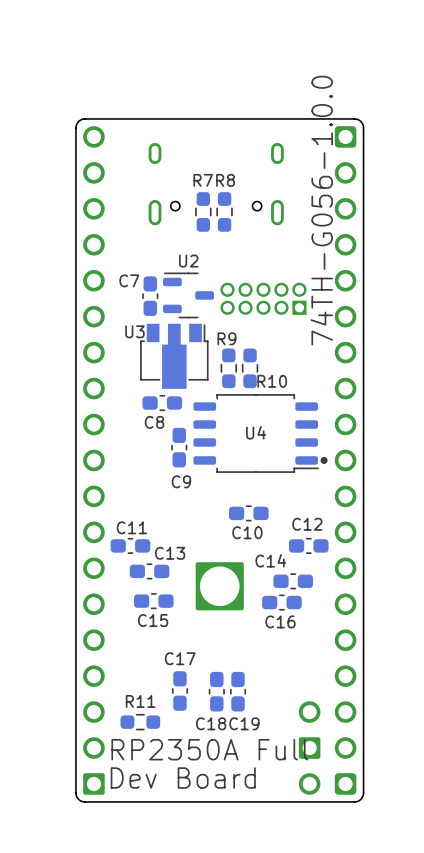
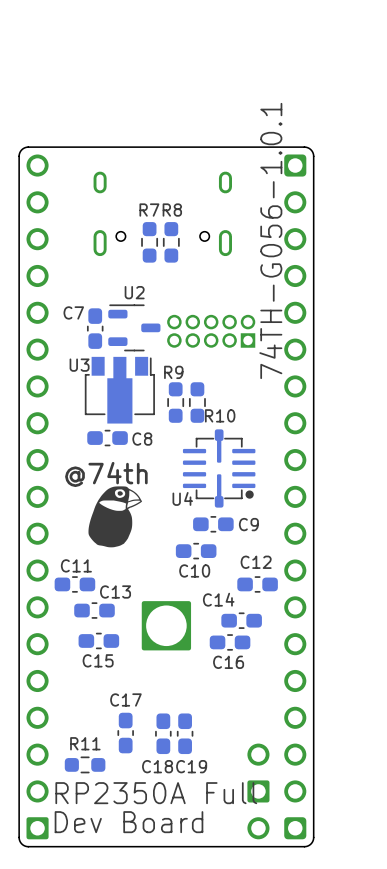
text: 74TH-G056-1.0.0 (321, 210) -> 74TH-G056-1.0.1 (270, 240)
U4 footprint: [193, 394, 328, 473] -> [182, 429, 256, 508]
C8 name position: C8 (154, 422) -> C8 (142, 439)
U4 name position: U4 (256, 432) -> U4 (182, 498)
C9 rotation: 0° (179, 447) -> 90° clockwise (213, 524)
C9 position: (179, 447) -> (213, 524)
drawing: none -> [88, 486, 143, 548]
C9 name position: C9 (181, 481) -> C9 (248, 524)

